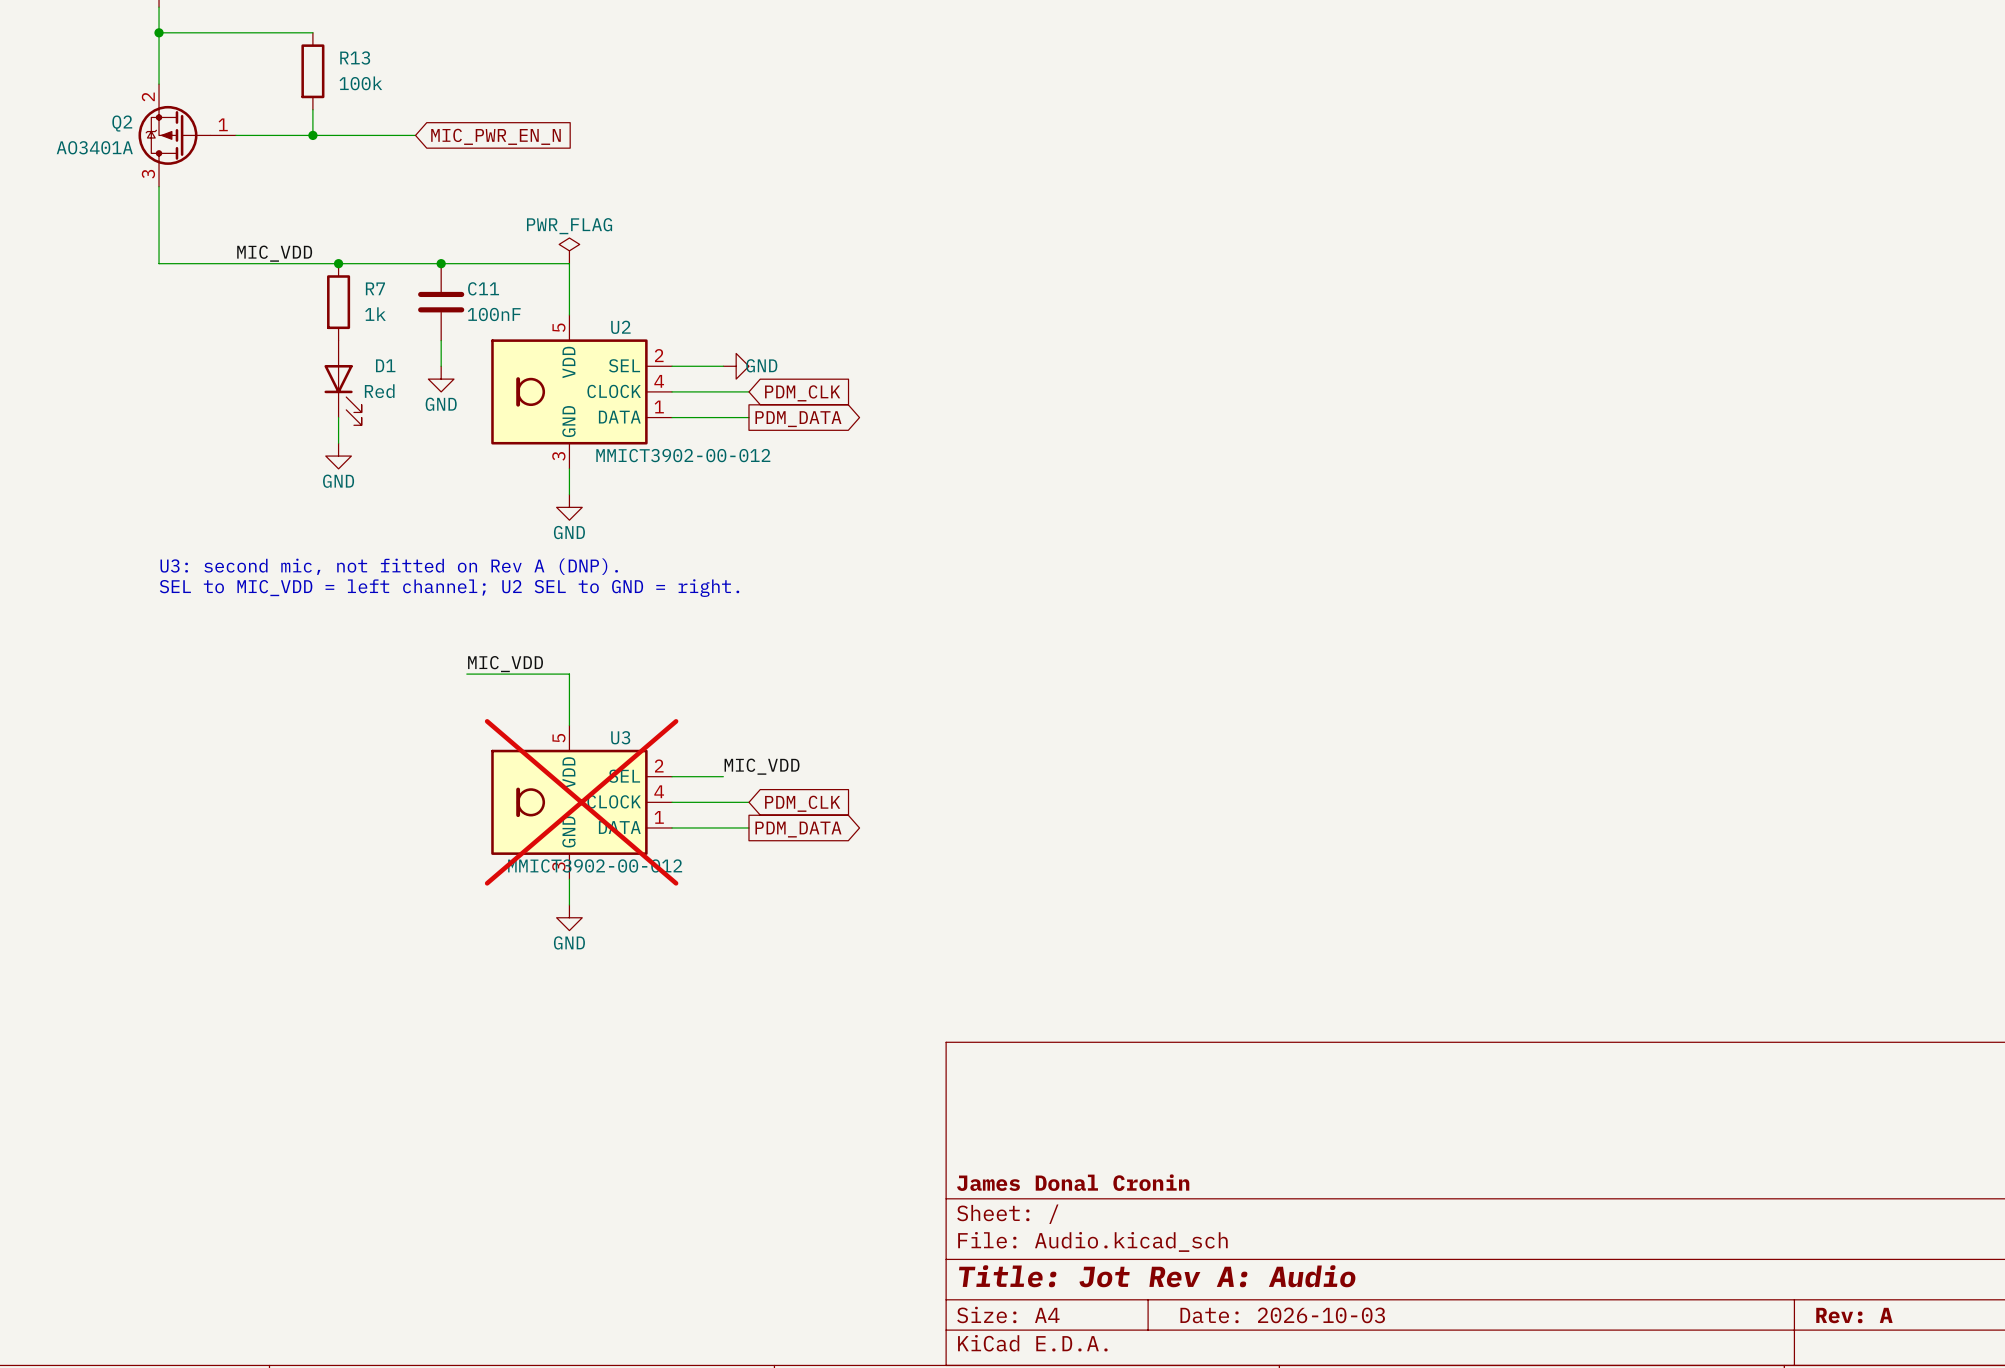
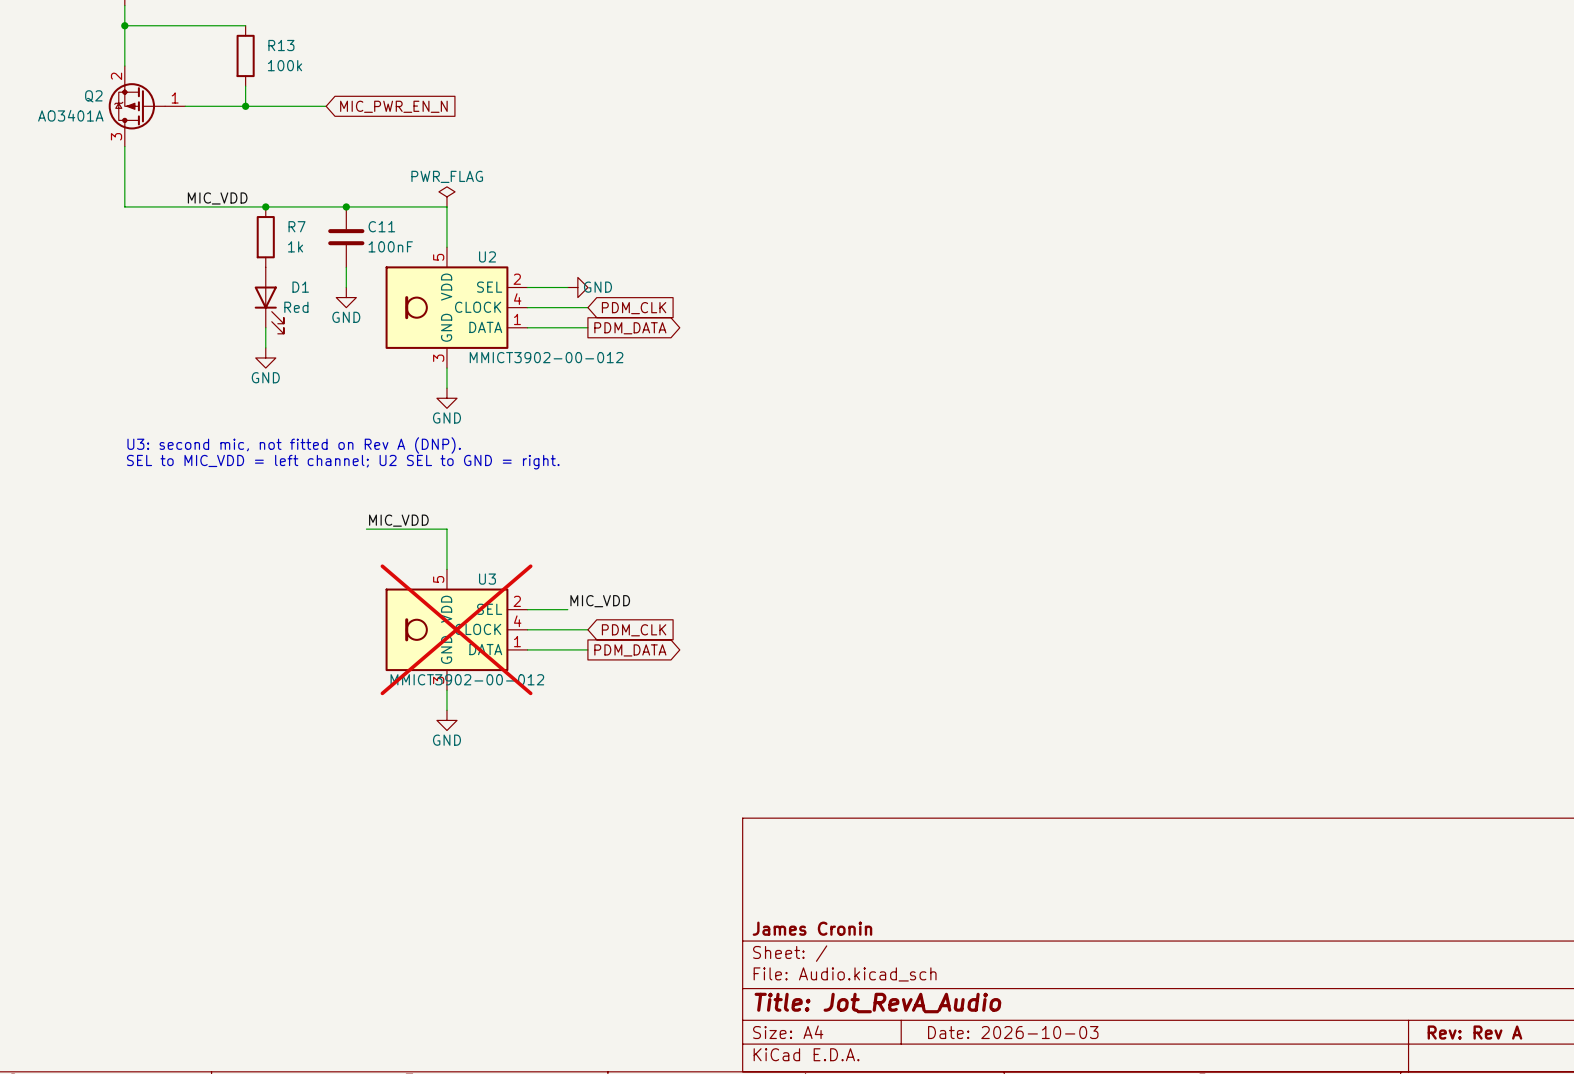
title block: James Donal Cronin (1073, 1182) -> James Cronin (812, 928)
title block: Title: Jot Rev A: Audio (1157, 1276) -> Title: Jot_RevA_Audio (877, 1003)
title block: Rev: A (1854, 1315) -> Rev: Rev A (1474, 1032)

